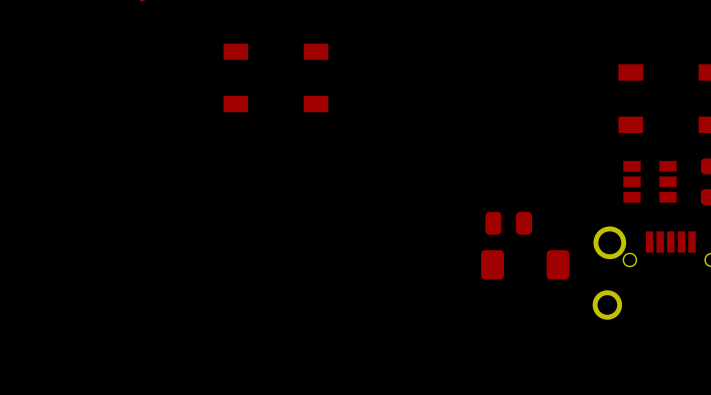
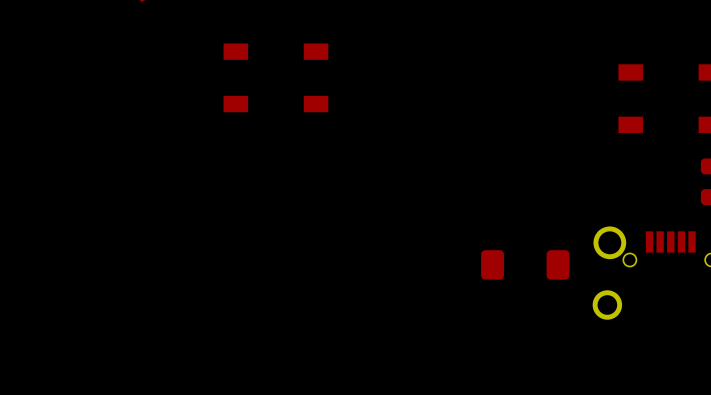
part: (650, 181) -> none
part: (508, 223) -> none

